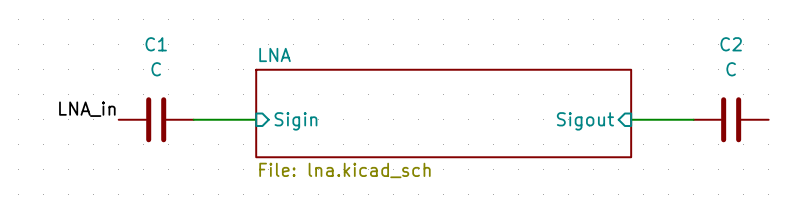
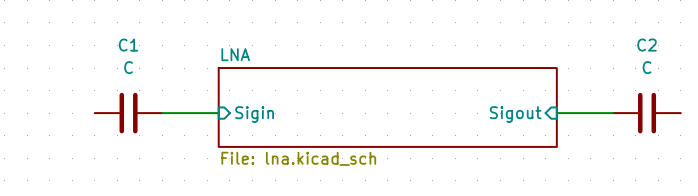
label: LNA_in (87, 109) -> none

